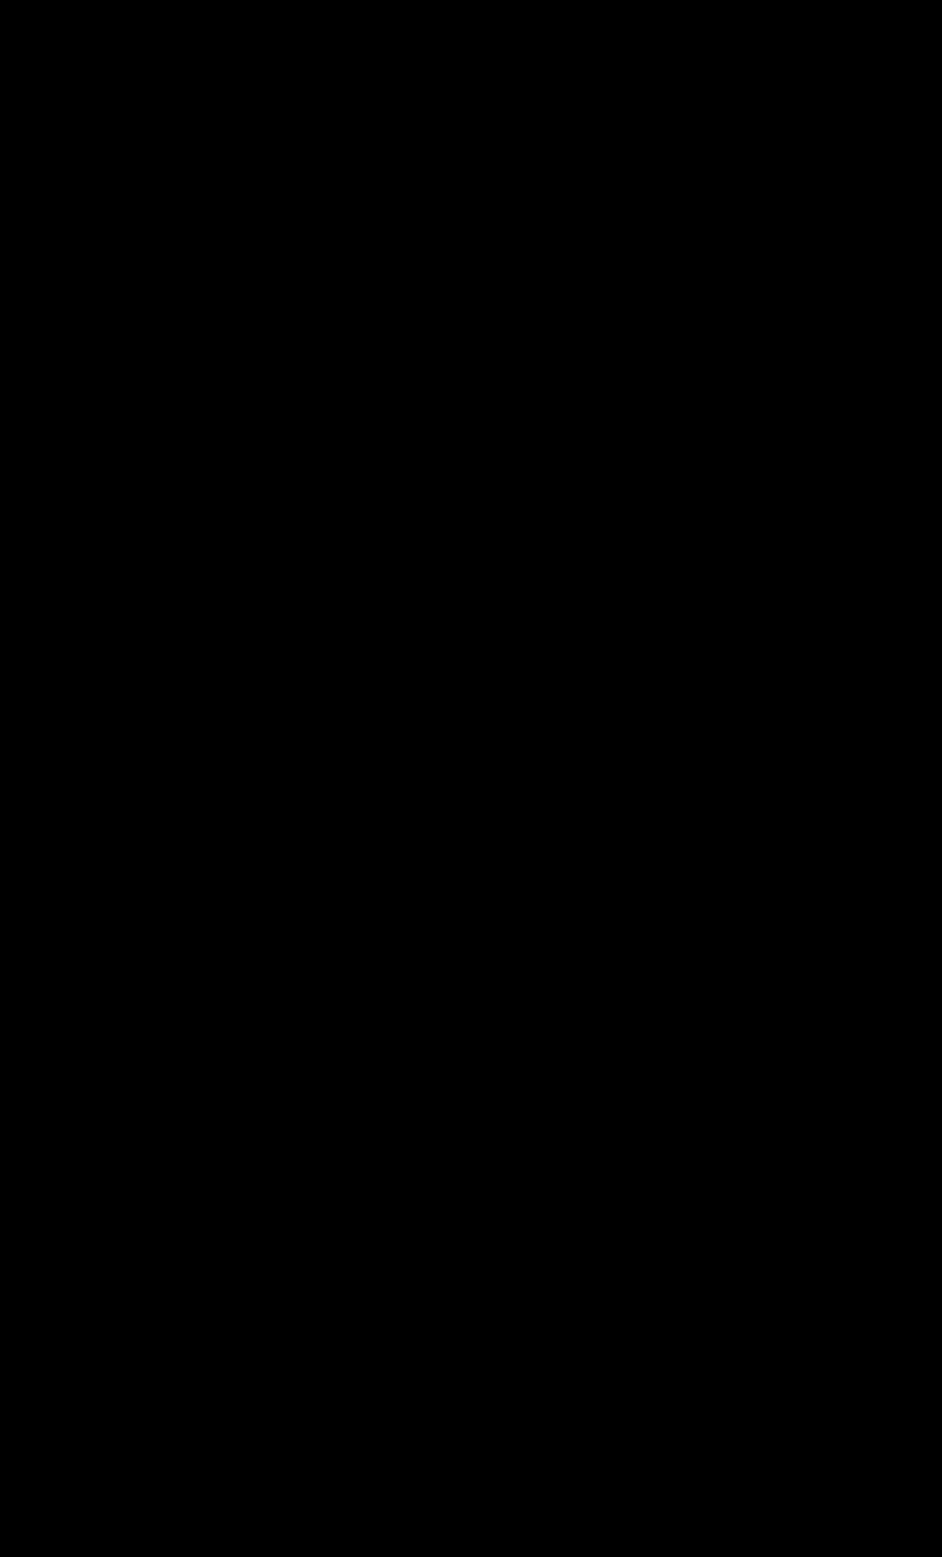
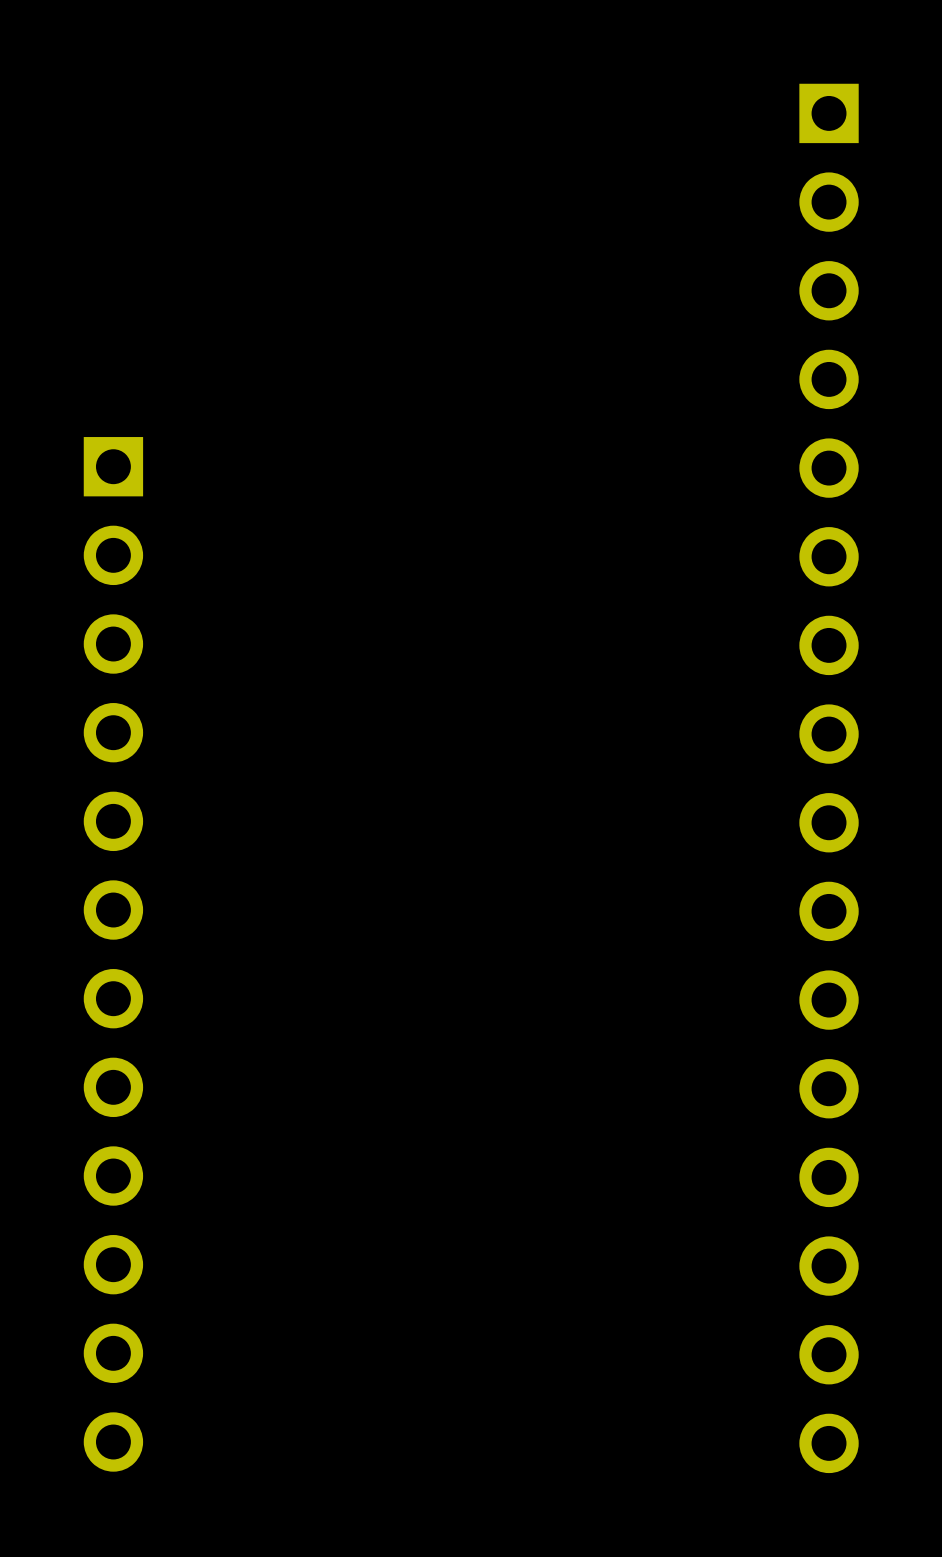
part: none -> (829, 778)
part: none -> (113, 954)

